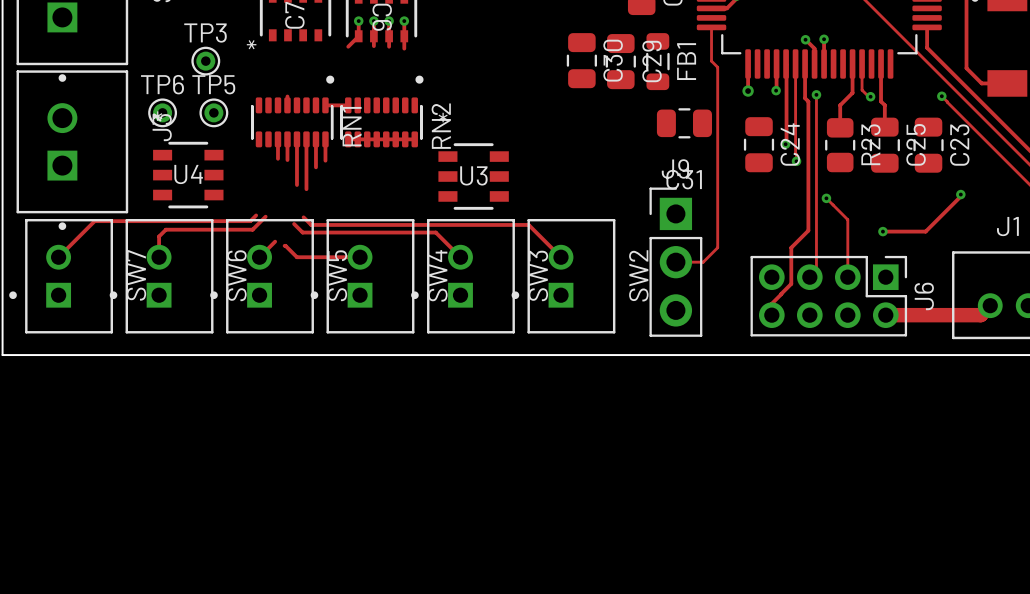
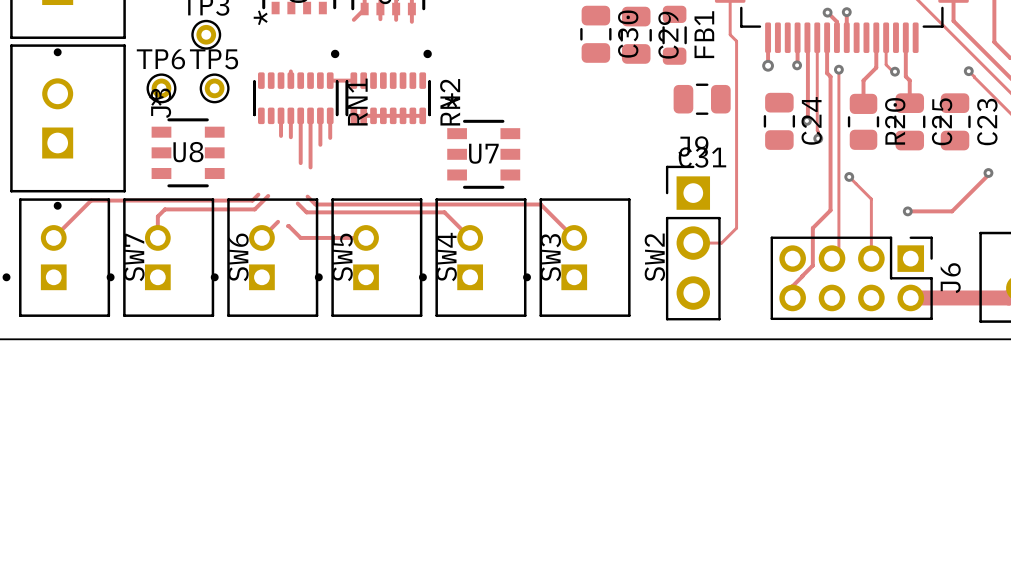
R23 name: R23 (870, 144) -> R20 (895, 121)
U4 name: U4 (188, 174) -> U8 (188, 152)
U3 name: U3 (473, 175) -> U7 (483, 153)

